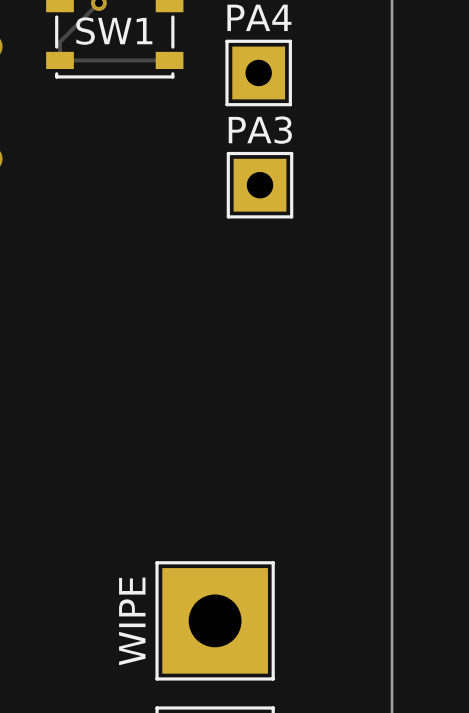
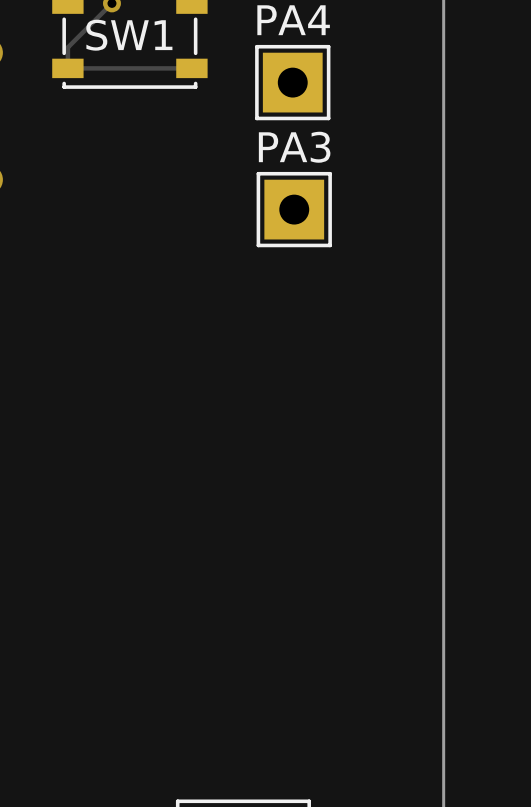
part: WIPE (215, 620) -> none

